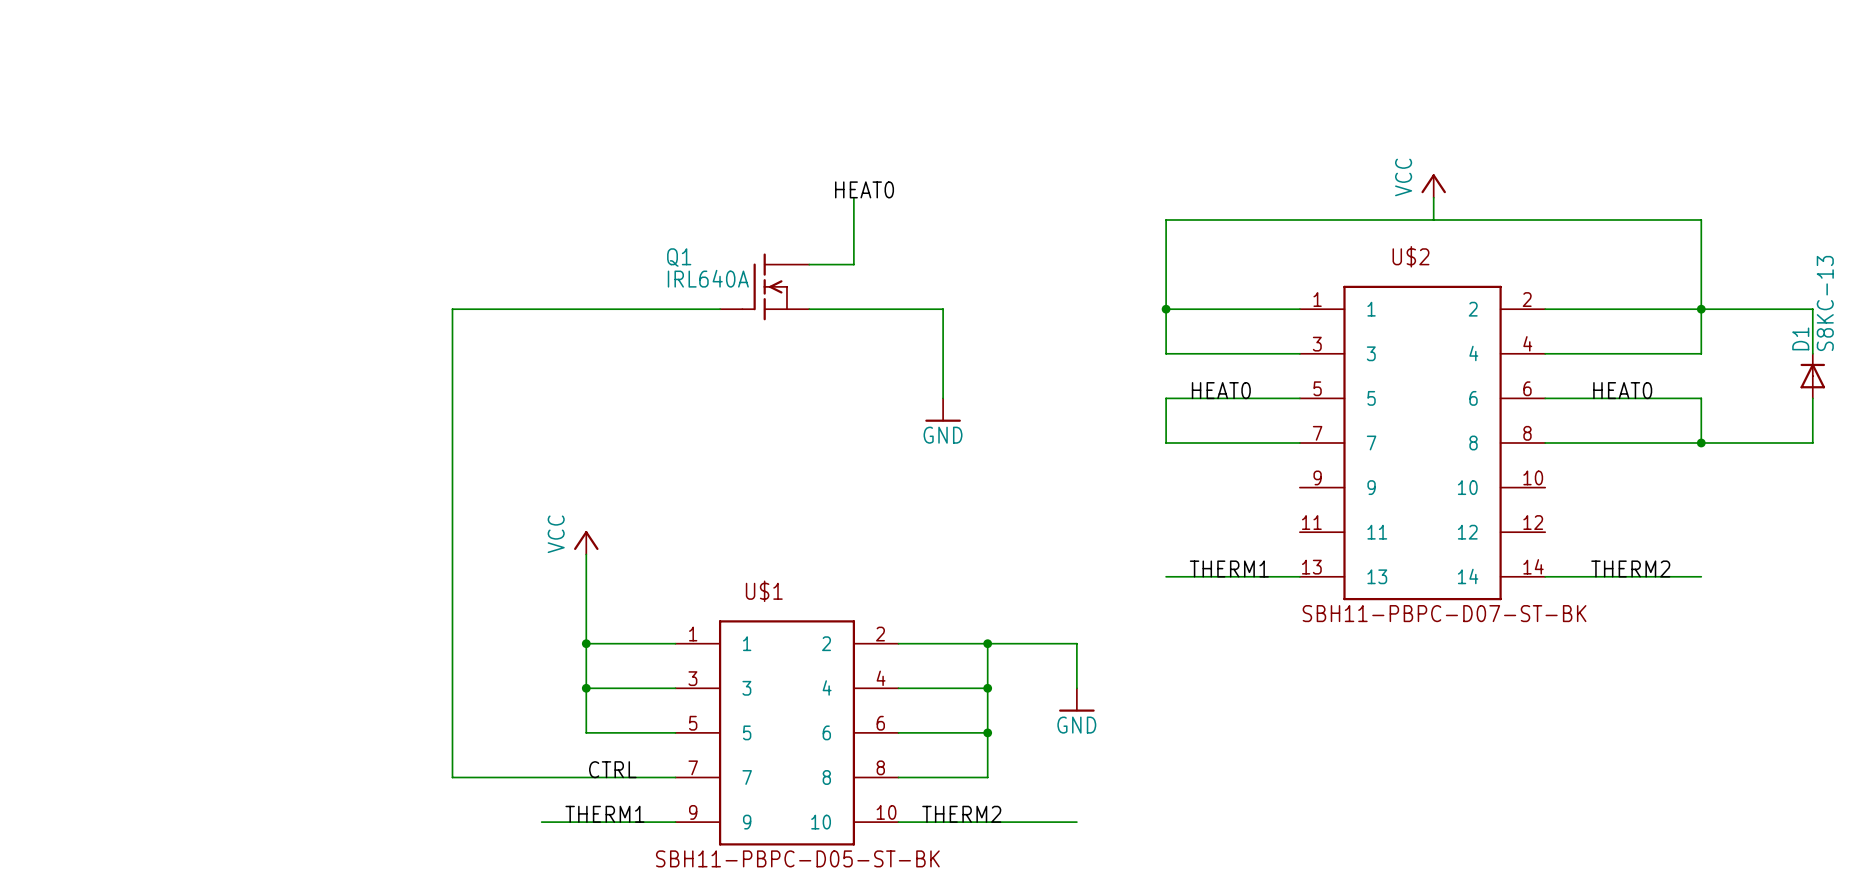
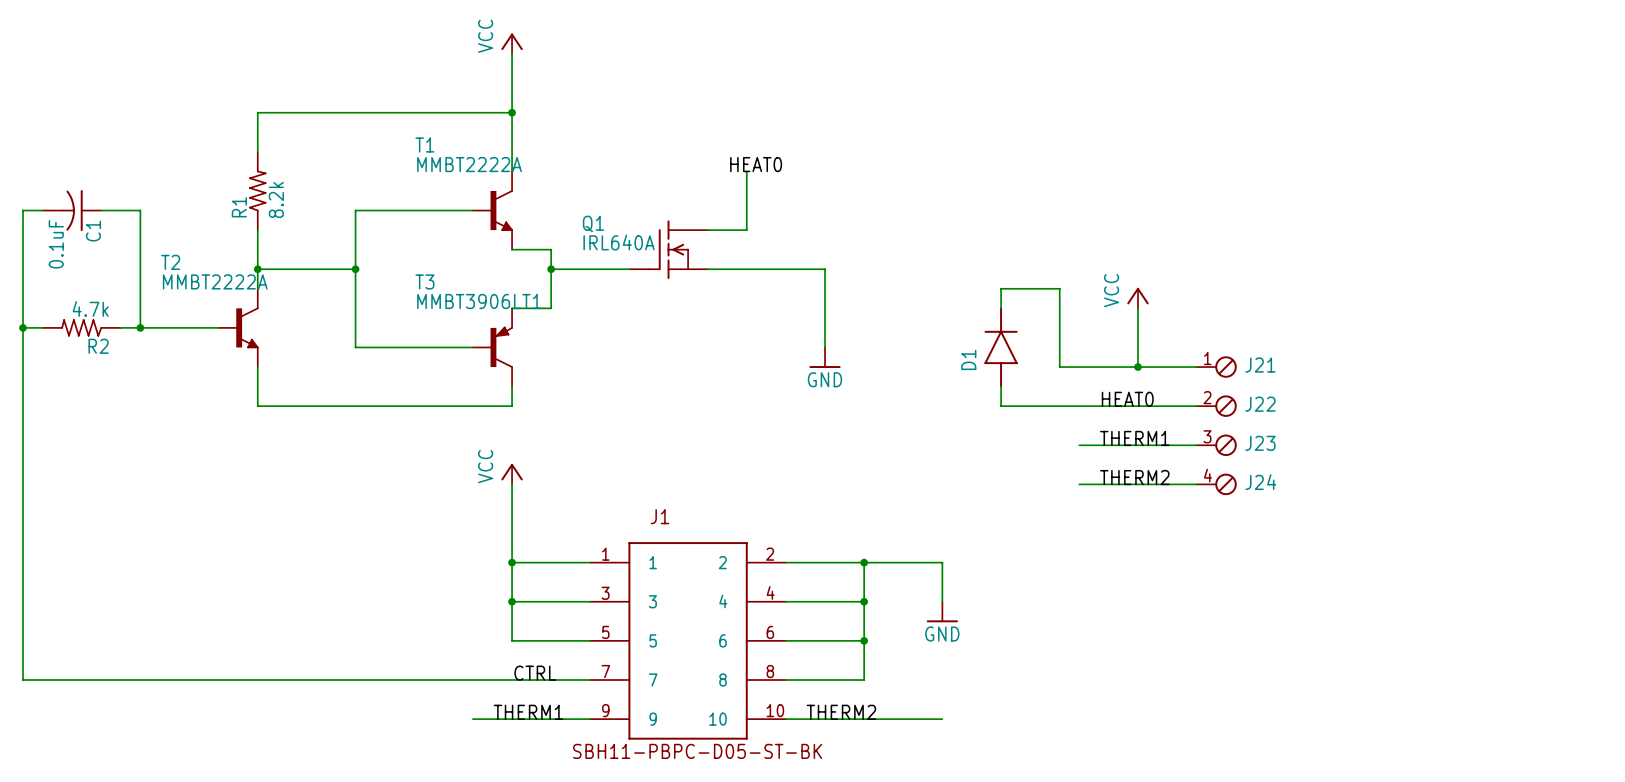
power symbol: none -> VCC (512, 43)
wire: none -> (512, 54) (512, 171)
wire: none -> (512, 112) (257, 112) (257, 151)
junction: none -> (512, 112)
power symbol position: VCC (1433, 185) -> VCC (1137, 298)
wire: (1433, 197) (1433, 219) -> none
R1: none -> 8.2k (257, 190)
C1: none -> 0.1uF (71, 210)
wire: none -> (101, 210) (140, 210) (140, 327)
wire: none -> (472, 210) (355, 210) (355, 347) (472, 347)
T1: none -> MMBT2222A (492, 210)
wire: none -> (257, 230) (257, 288)
wire: none -> (512, 249) (551, 249) (551, 308) (512, 308)
D1 value: S8KC-13 (1825, 303) -> none
wire: none -> (257, 269) (355, 269)
junction: none -> (257, 269)
junction: none -> (355, 269)
wire: (630, 309) (452, 309) (452, 777) -> (42, 210) (23, 210) (23, 680) (394, 680)
junction: none -> (551, 269)
wire: (1166, 309) (1299, 309) -> (1079, 445) (1196, 445)
junction: (1166, 309) -> none
wire: (1545, 309) (1812, 309) (1812, 353) -> none
junction: (1701, 309) -> none
D1 name position: D1 (1800, 338) -> D1 (968, 359)
wire: none -> (1001, 308) (1001, 288) (1059, 288) (1059, 367) (1196, 367)
wire: (1299, 353) (1166, 353) (1166, 219) (1701, 219) (1701, 353) (1545, 353) -> (1137, 308) (1137, 367)
D1 symbol: [1800, 353, 1826, 399] -> [984, 307, 1018, 388]
wire: none -> (23, 327) (42, 327)
junction: none -> (23, 327)
R2: none -> 4.7k (81, 327)
wire: none -> (120, 327) (218, 327)
junction: none -> (140, 327)
T2: none -> MMBT2222A (238, 327)
label position: HEAT0 (1221, 390) -> HEAT0 (1127, 399)
label: HEAT0 (1622, 390) -> none
T3: none -> MMBT3906LT1 (492, 347)
wire: (1299, 398) (1166, 398) (1166, 442) (1299, 442) -> none
wire: (1545, 398) (1701, 398) (1701, 442) -> none
wire: (1812, 398) (1812, 442) (1545, 442) -> none
wire: none -> (257, 367) (257, 406) (512, 406) (512, 386)
junction: none -> (1137, 367)
J21: none -> (1216, 367)
wire: none -> (1001, 386) (1001, 406) (1196, 406)
U$2: (1422, 442) -> none
junction: (1701, 442) -> none
J22: none -> (1216, 406)
J23: none -> (1216, 445)
label: none -> THERM2 (1134, 477)
J24: none -> (1216, 484)
label position: THERM1 (1229, 568) -> THERM1 (1134, 438)
label: THERM2 (1630, 568) -> none
wire: (1166, 576) (1299, 576) -> (1079, 484) (1196, 484)
wire: (1545, 576) (1701, 576) -> none
U$1 name: U$1 (764, 591) -> J1 (659, 516)

